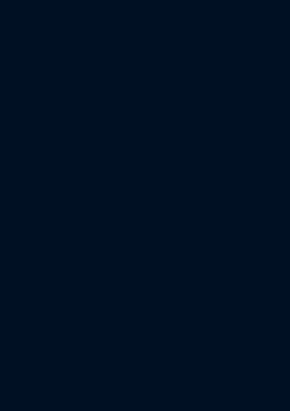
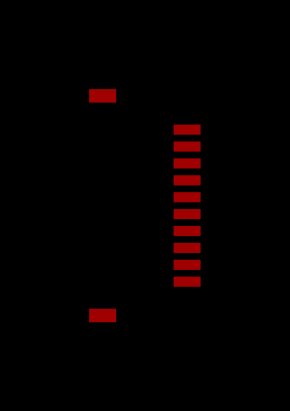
part: none -> (144, 205)

